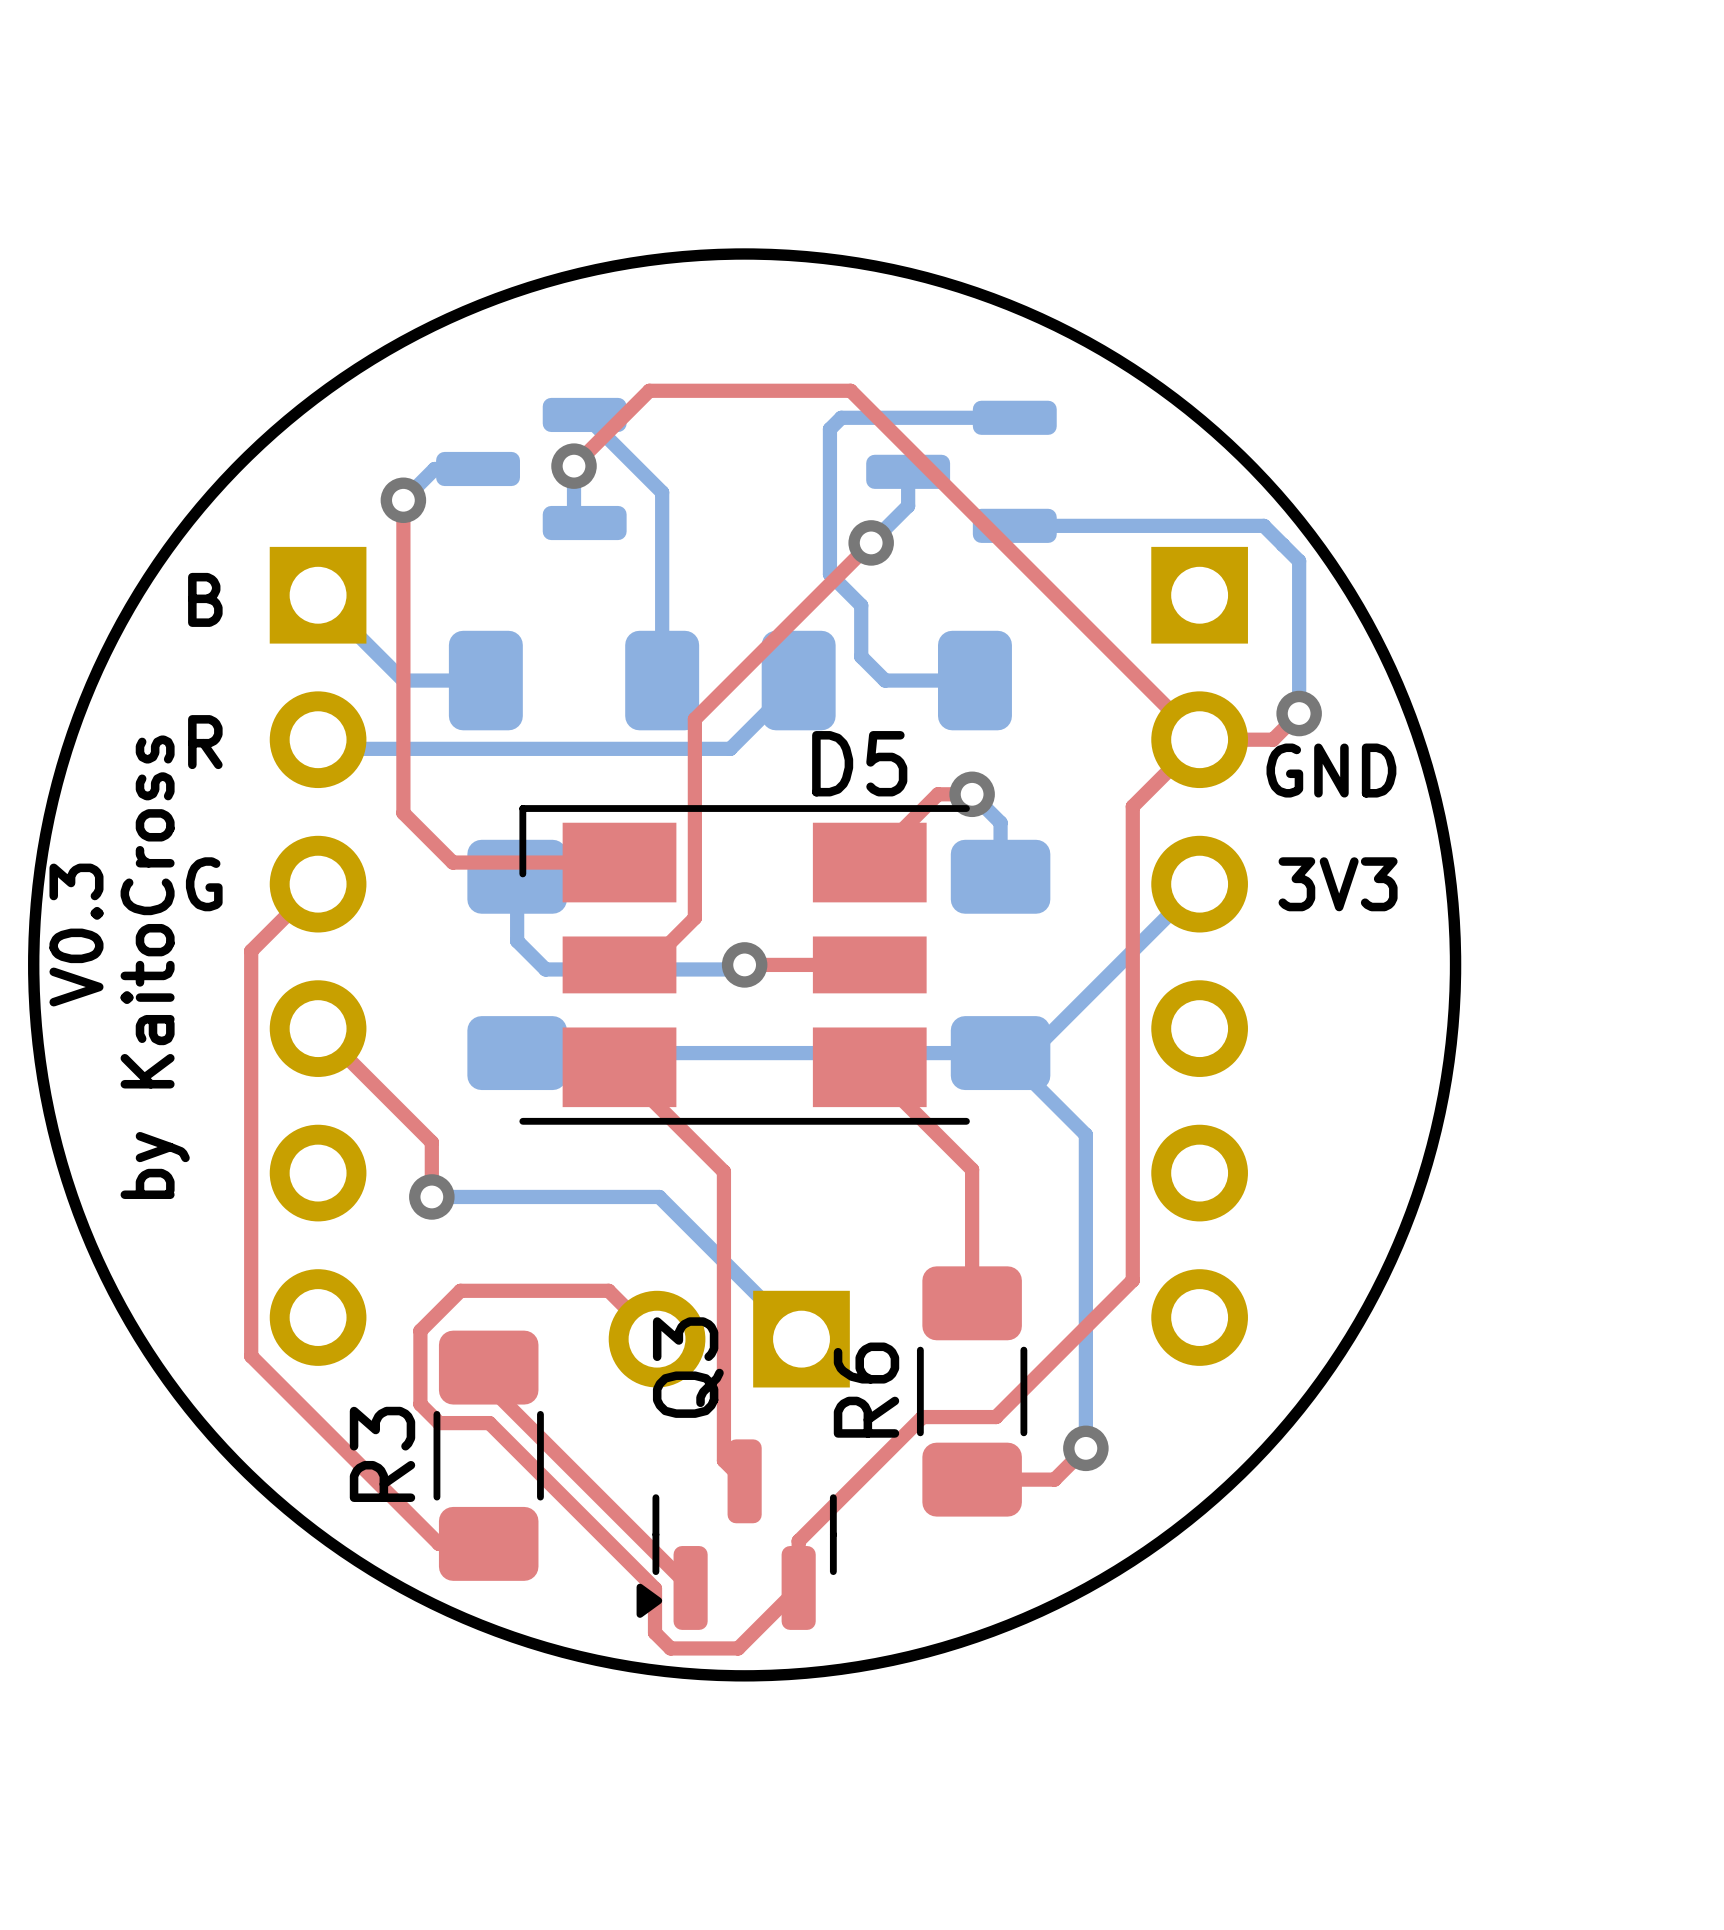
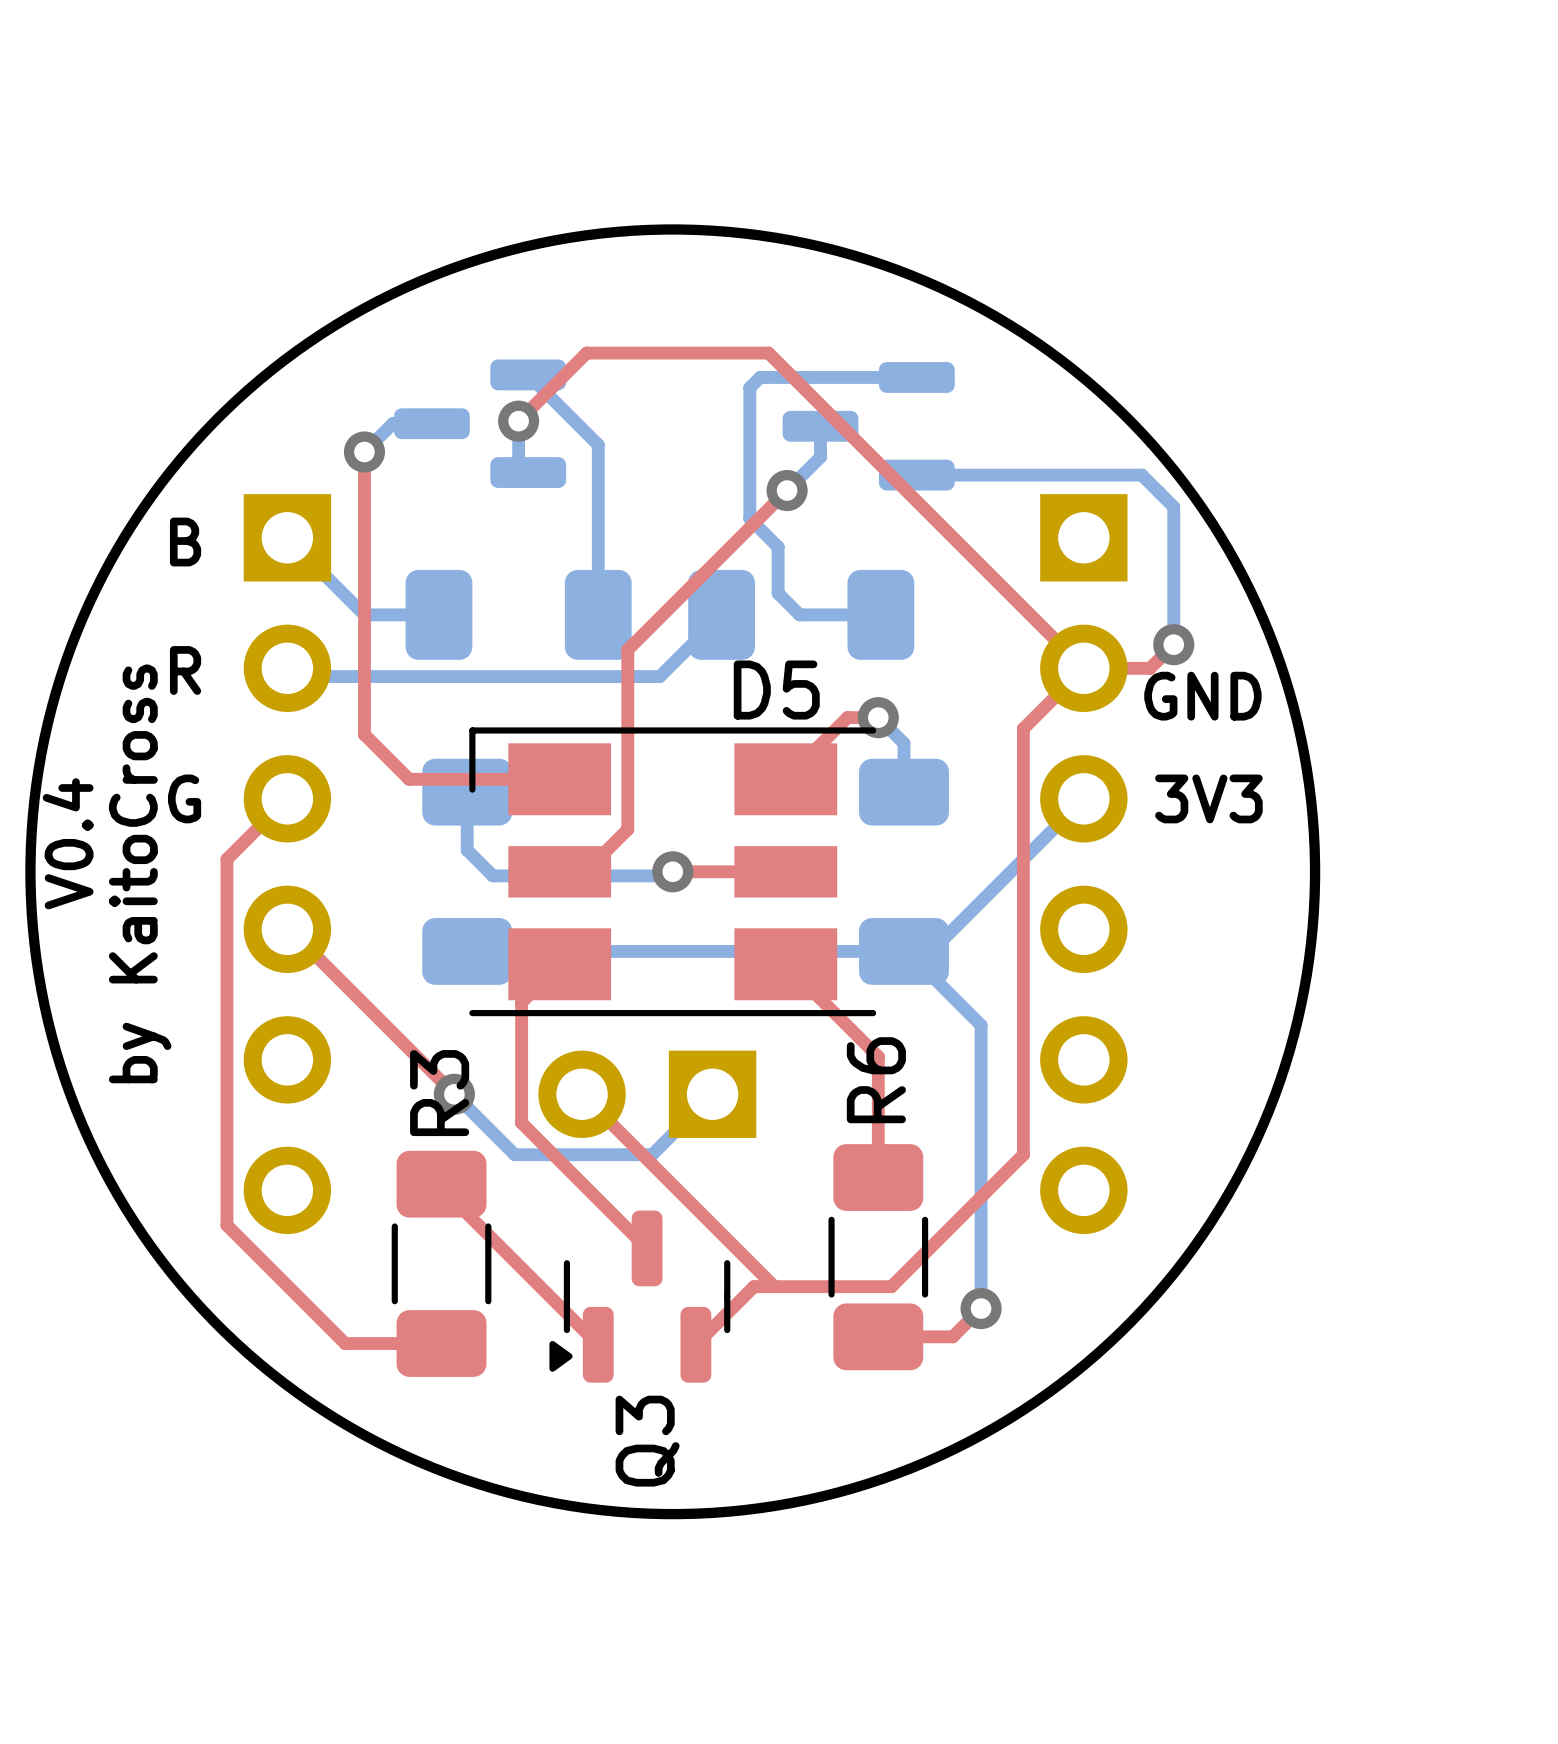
text: V0.3 (76, 935) -> V0.4 (68, 843)
top track: (318, 1028) (431, 1142) (431, 1196) -> (287, 929) (454, 1094)
top track: (619, 1067) (723, 1171) (723, 1460) (744, 1481) -> (559, 964) (521, 1002) (521, 1123) (647, 1248)
bottom track: (431, 1196) (659, 1196) (801, 1339) -> none
via position: (431, 1196) -> (454, 1094)
bottom track: none -> (454, 1094) (514, 1154) (652, 1154) (712, 1094)
top track: none -> (582, 1094) (774, 1286)
top track: (1132, 1278) (1132, 1280) (996, 1417) (922, 1417) (798, 1541) (798, 1587) (738, 1648) (670, 1648) (655, 1632) (655, 1588) (489, 1423) (439, 1423) (420, 1404) (420, 1330) (460, 1290) (608, 1290) (657, 1339) (637, 1358) -> (1023, 1154) (891, 1286) (754, 1286) (695, 1344)
top track: none -> (441, 1184) (441, 1188) (598, 1344)
part position: (729, 1339) -> (647, 1094)
top track: (488, 1367) (488, 1386) (690, 1587) -> none
Q3 name position: Q3 (688, 1367) -> Q3 (647, 1441)
R6 name position: R6 (866, 1390) -> R6 (876, 1080)
R3 name position: R3 (382, 1454) -> R3 (439, 1093)
R3 position: (488, 1455) -> (441, 1263)
top track: (382, 1487) (438, 1543) (488, 1543) -> (345, 1343) (441, 1343)
Q3 position: (736, 1534) -> (639, 1296)

